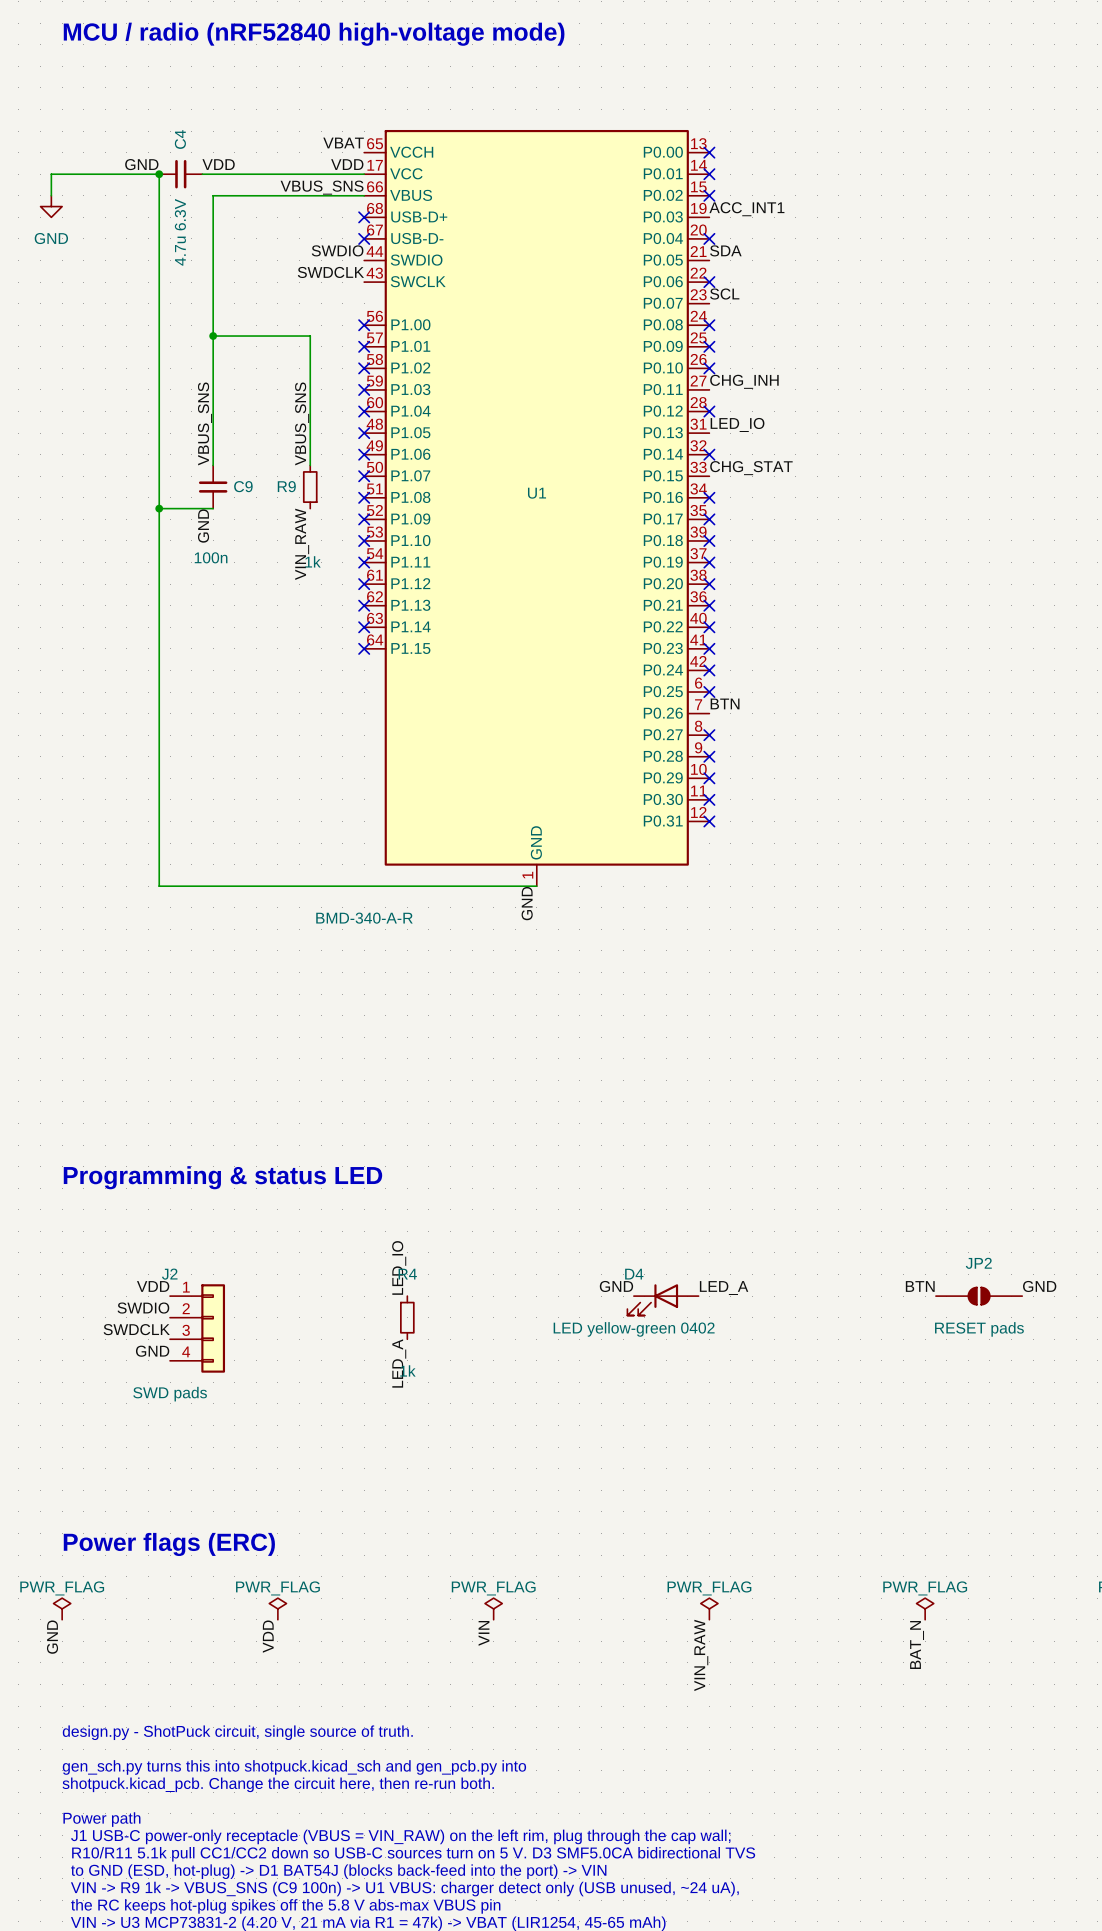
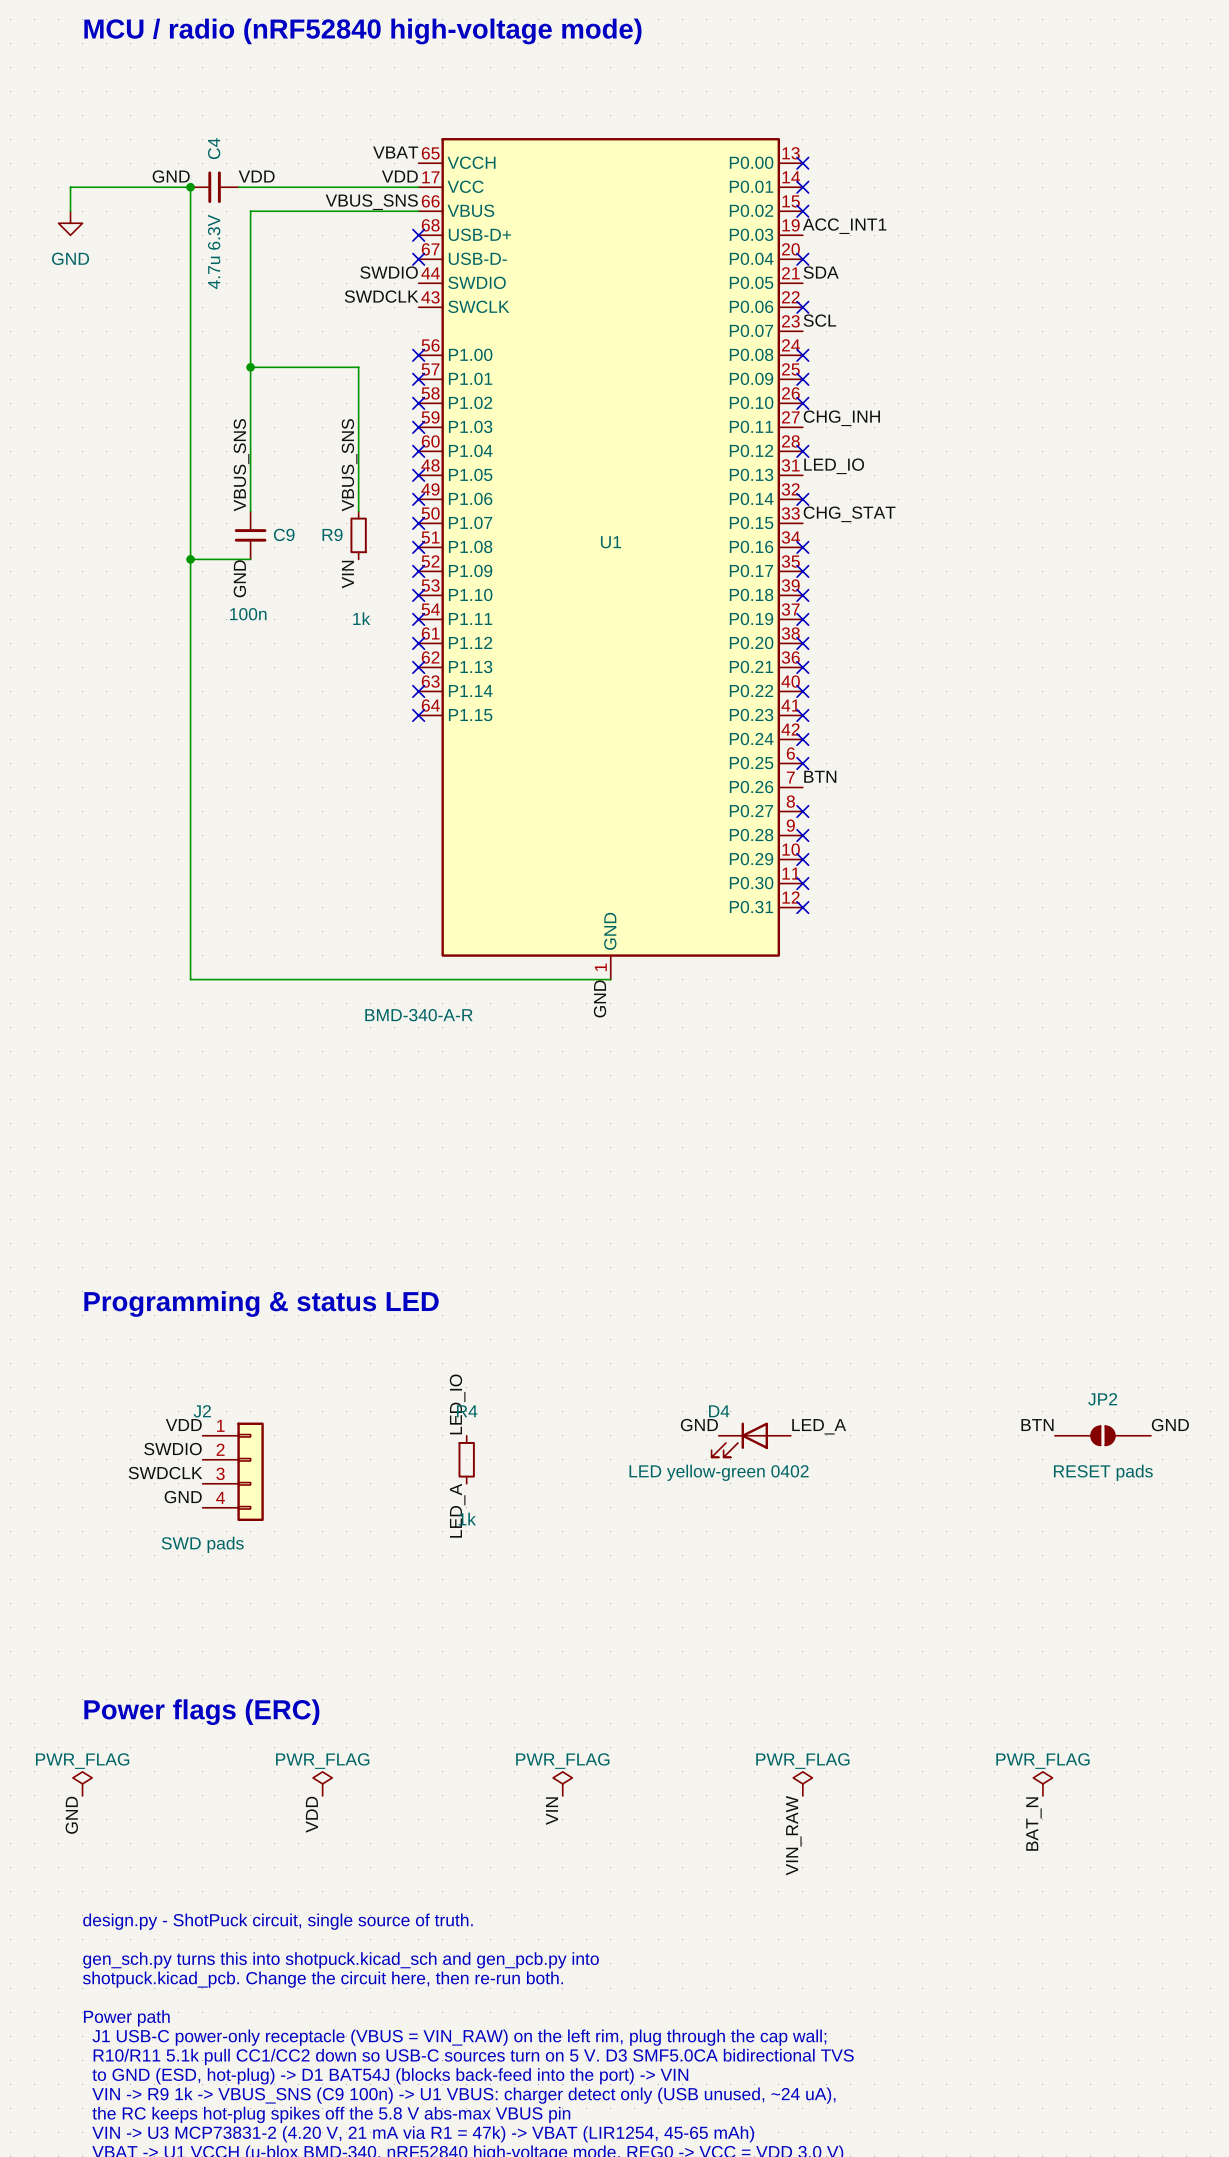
label: VIN_RAW (302, 544) -> VIN (347, 574)

